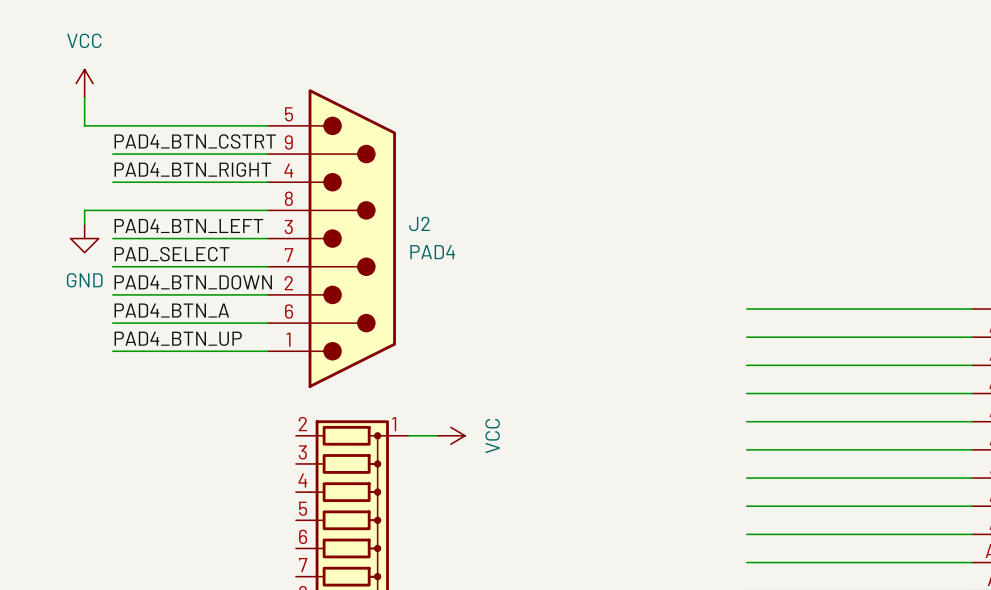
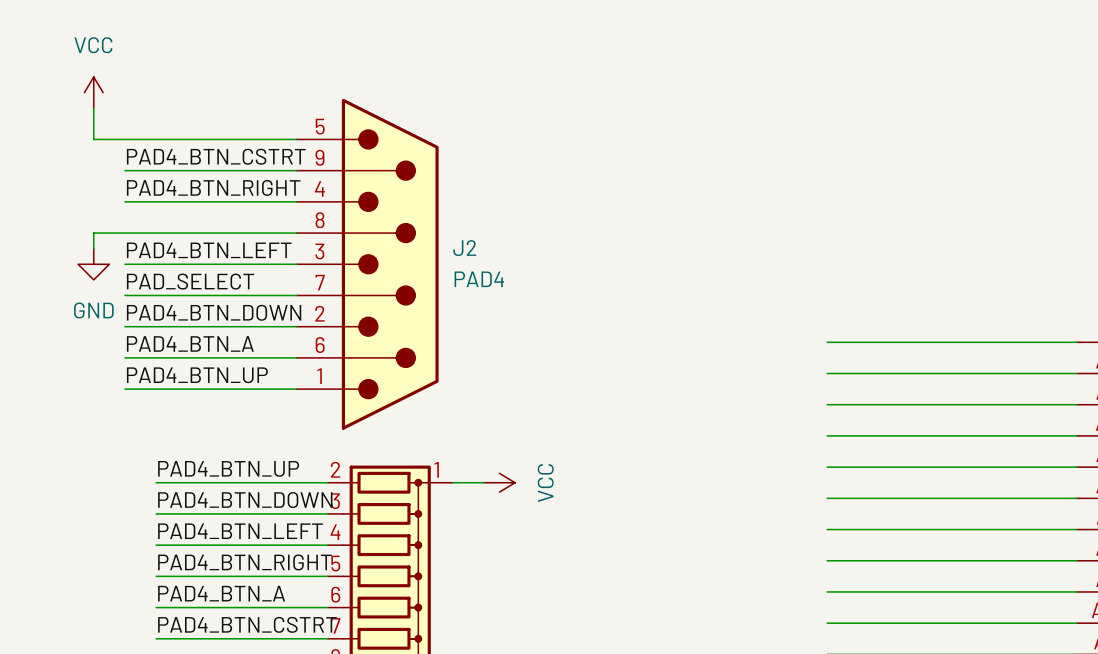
label: none -> PAD4_BTN_UP (228, 468)
wire: none -> (156, 482) (327, 482)
label: none -> PAD4_BTN_DOWN (245, 500)
wire: none -> (156, 513) (327, 513)
label: none -> PAD4_BTN_LEFT (240, 531)
wire: none -> (156, 545) (327, 545)
label: none -> PAD4_BTN_RIGHT (244, 562)
wire: none -> (156, 576) (327, 576)
label: none -> PAD4_BTN_A (221, 593)
wire: none -> (156, 607) (327, 607)
label: none -> PAD4_BTN_CSTRT (247, 624)
wire: none -> (156, 638) (327, 638)

